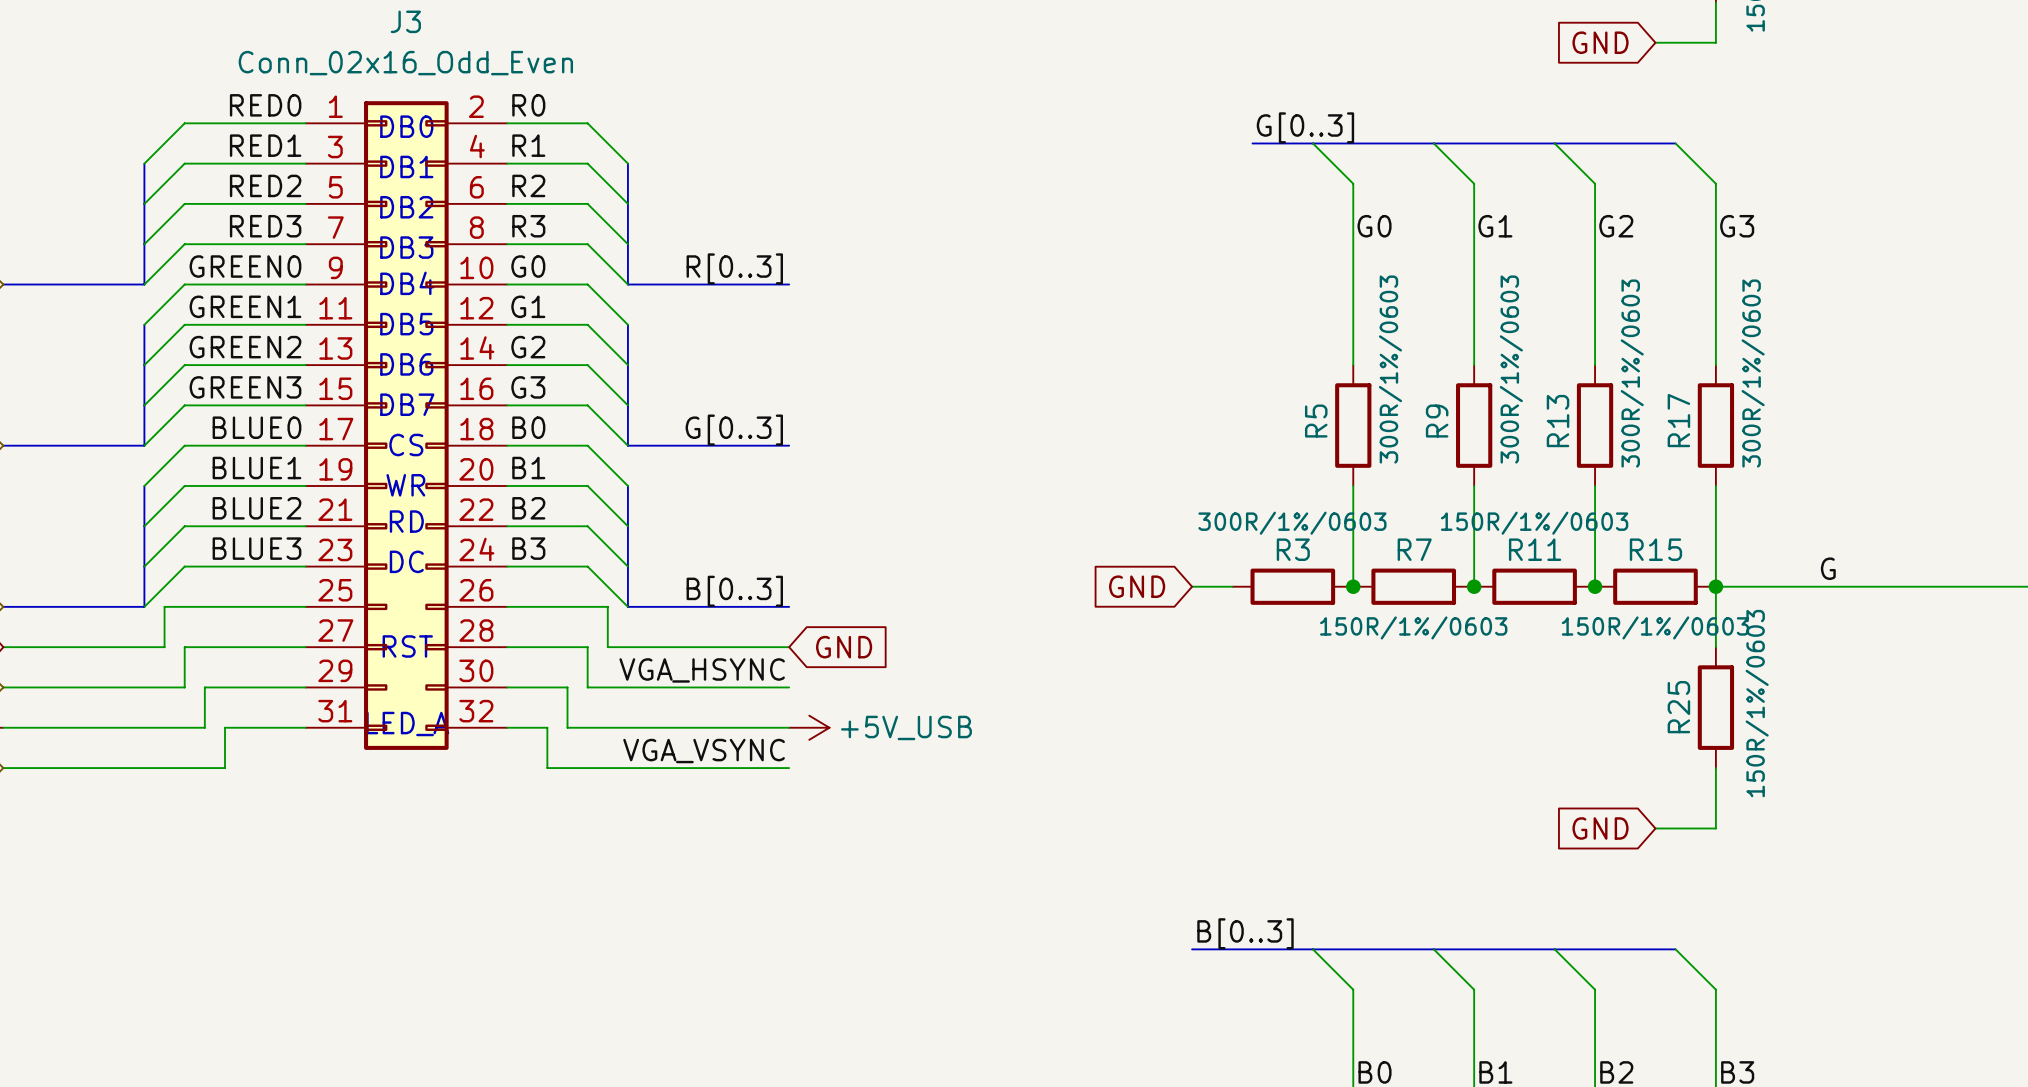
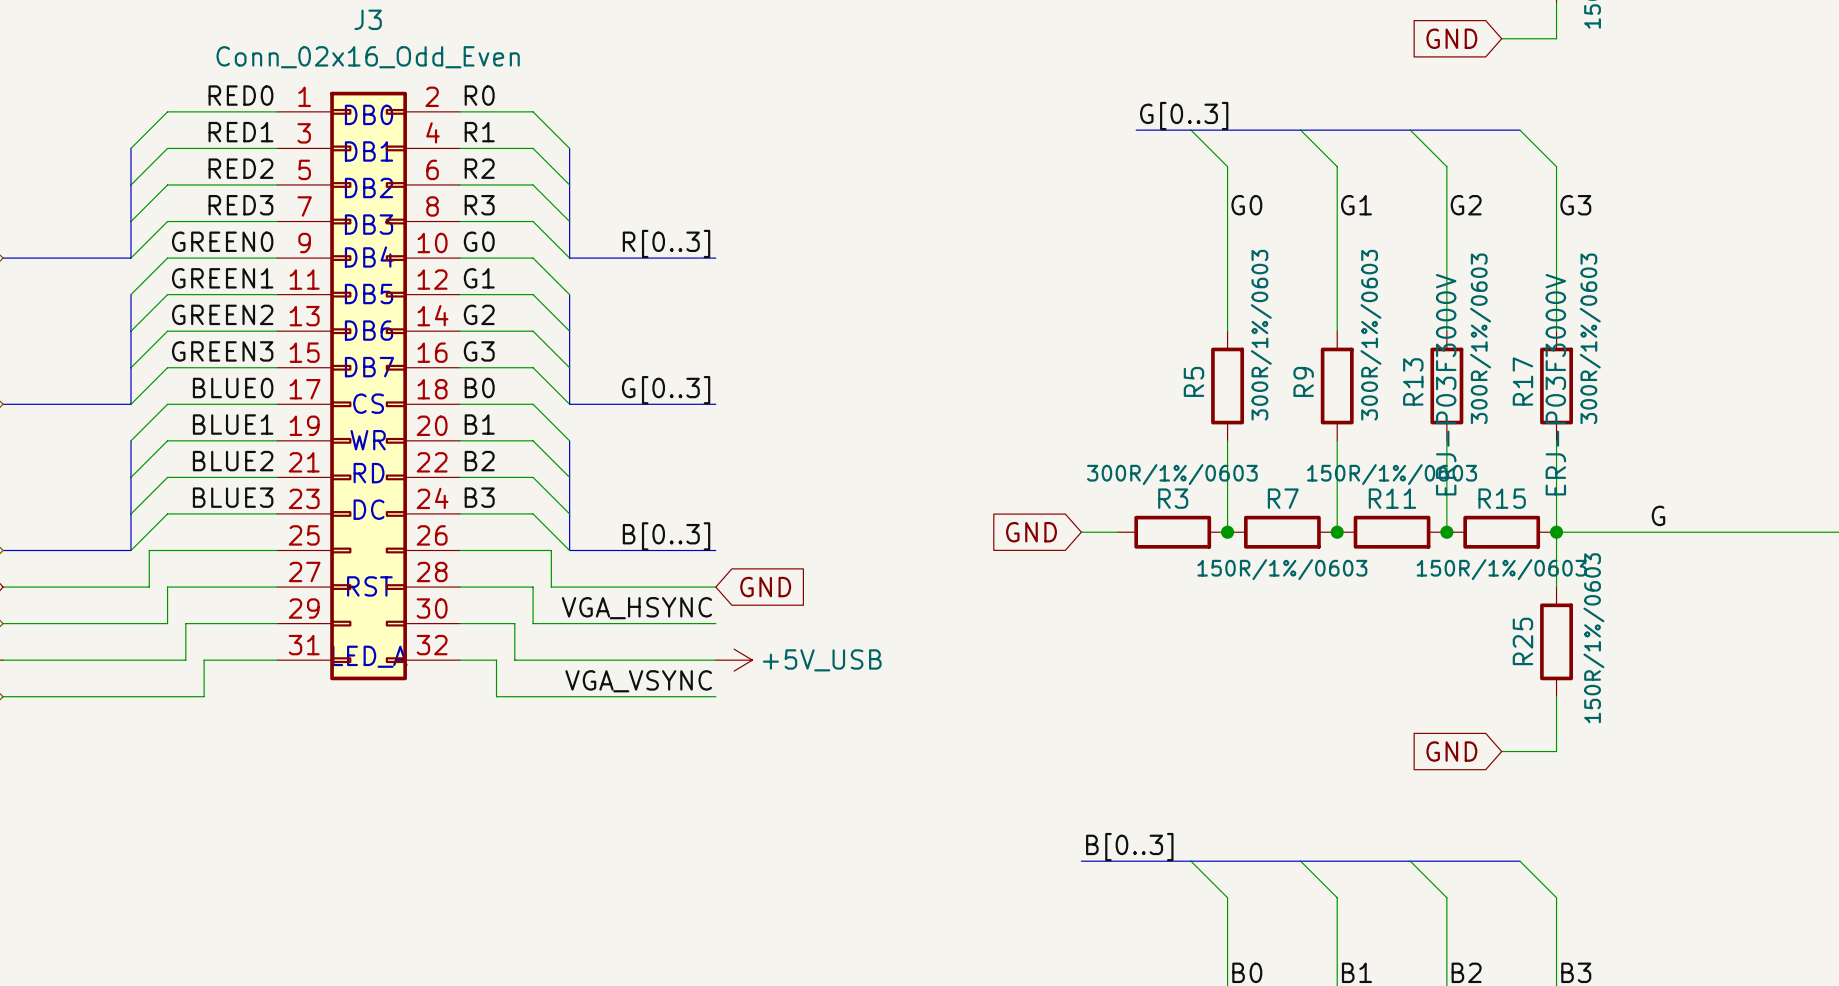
R13 text: none -> ERJ-P03F3000V (1446, 384)
R17 text: none -> ERJ-P03F3000V (1555, 384)

